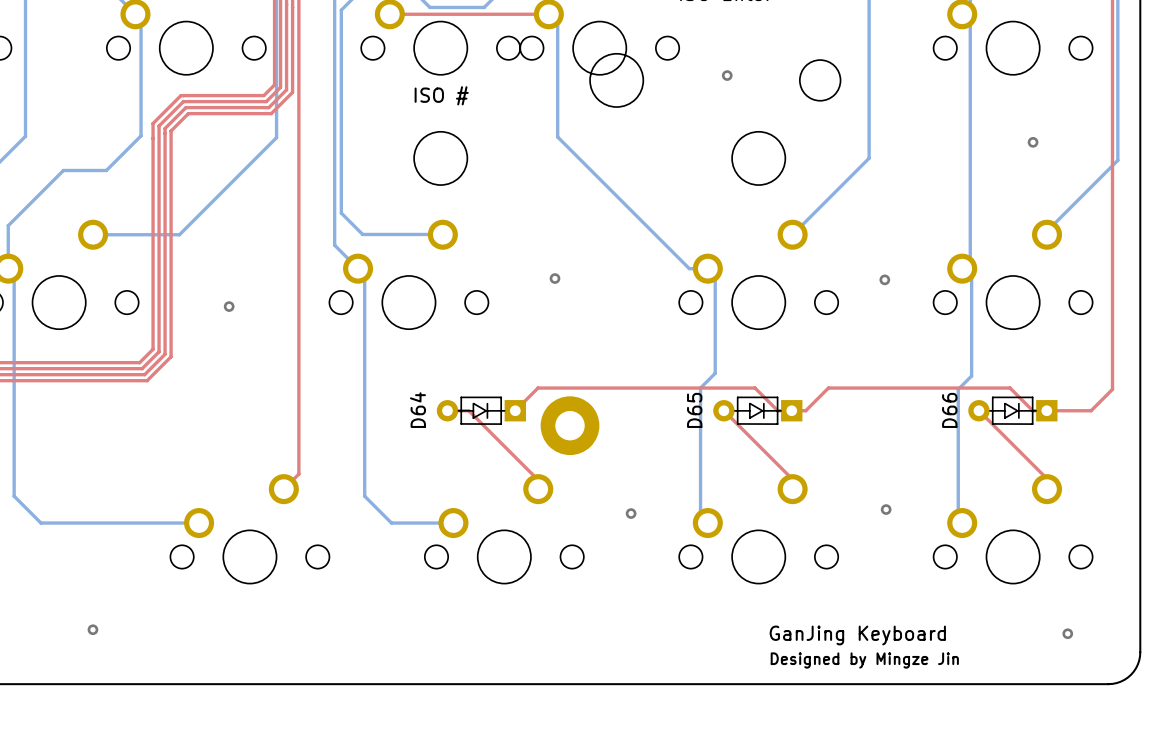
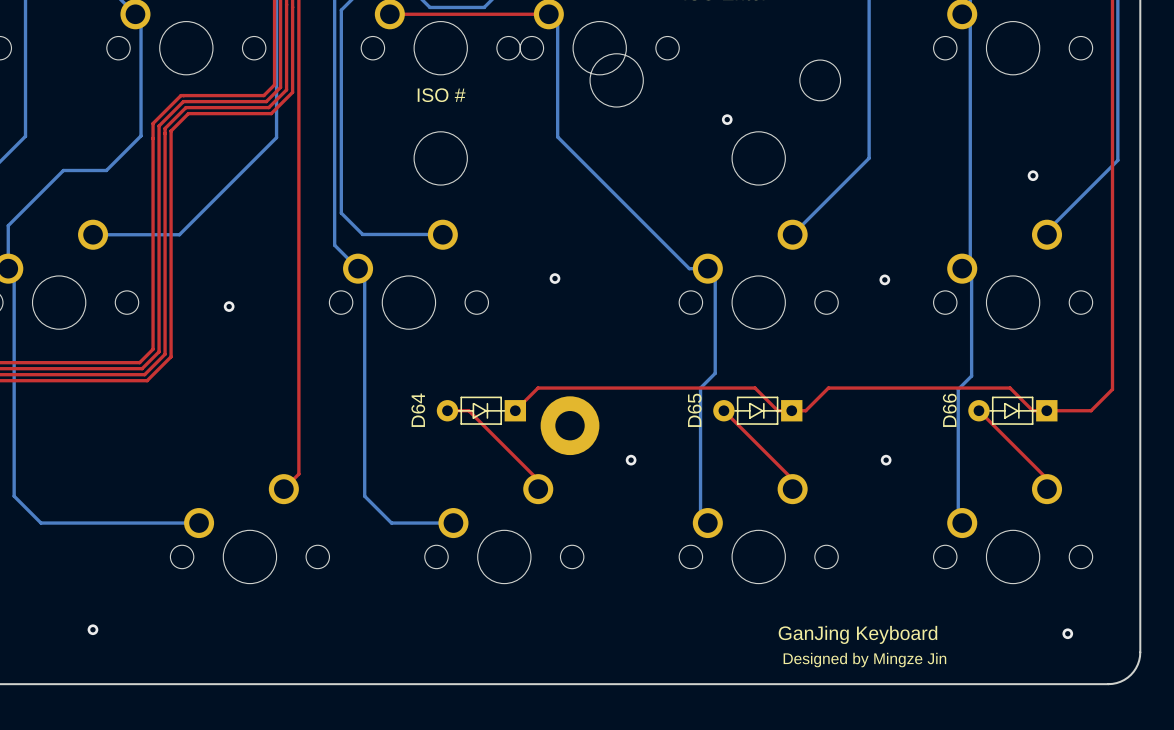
via position: (727, 75) -> (727, 119)
via position: (1033, 142) -> (1033, 175)
via position: (886, 509) -> (886, 460)
via position: (631, 513) -> (631, 460)

